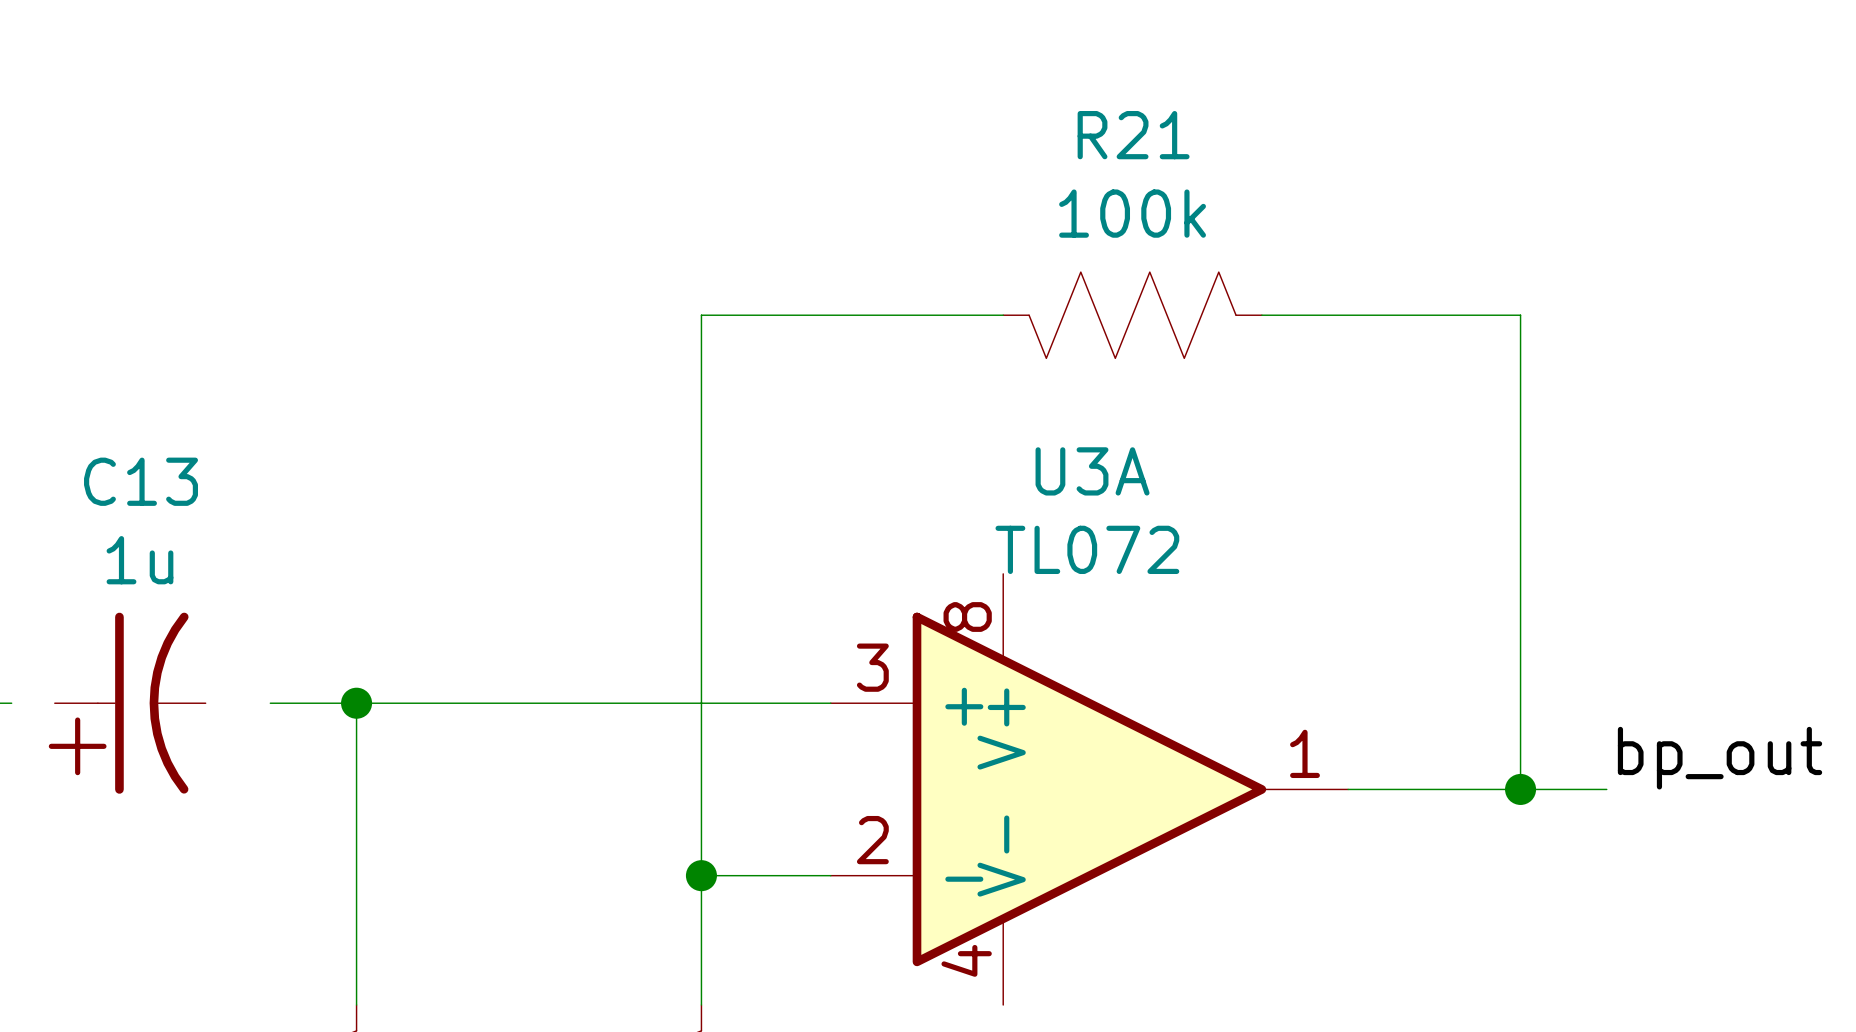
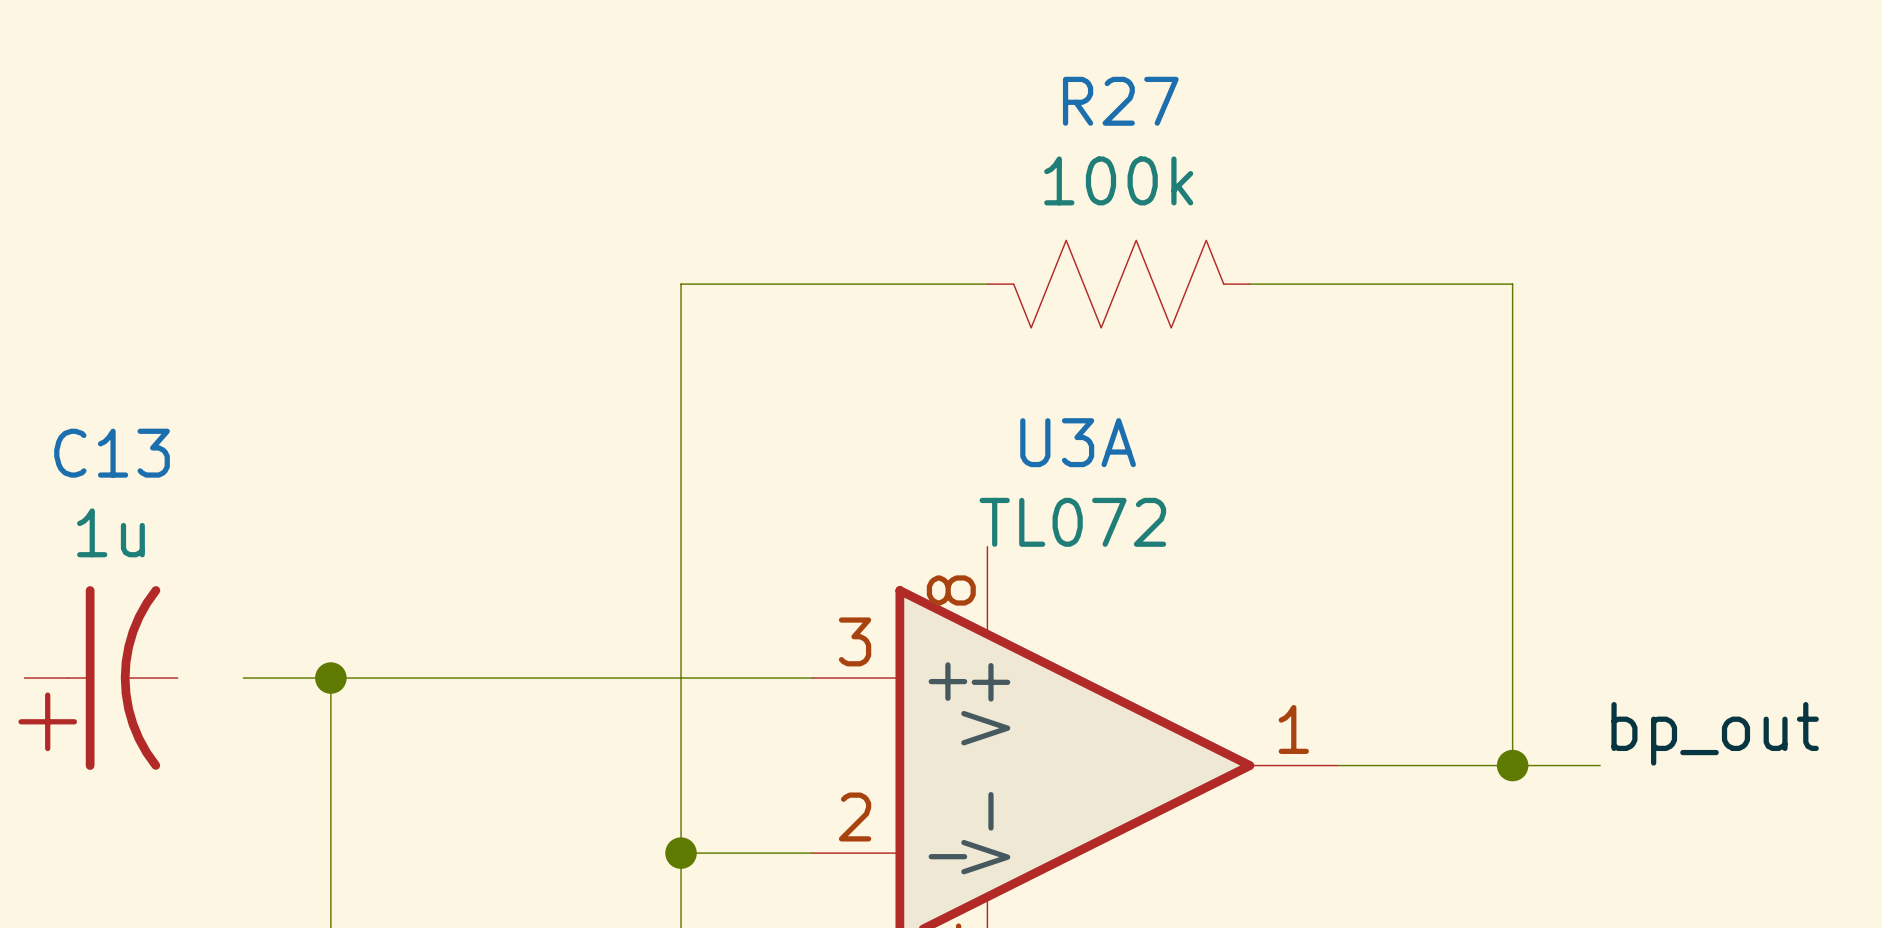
R21 name: R21 (1133, 135) -> R27 (1120, 101)

